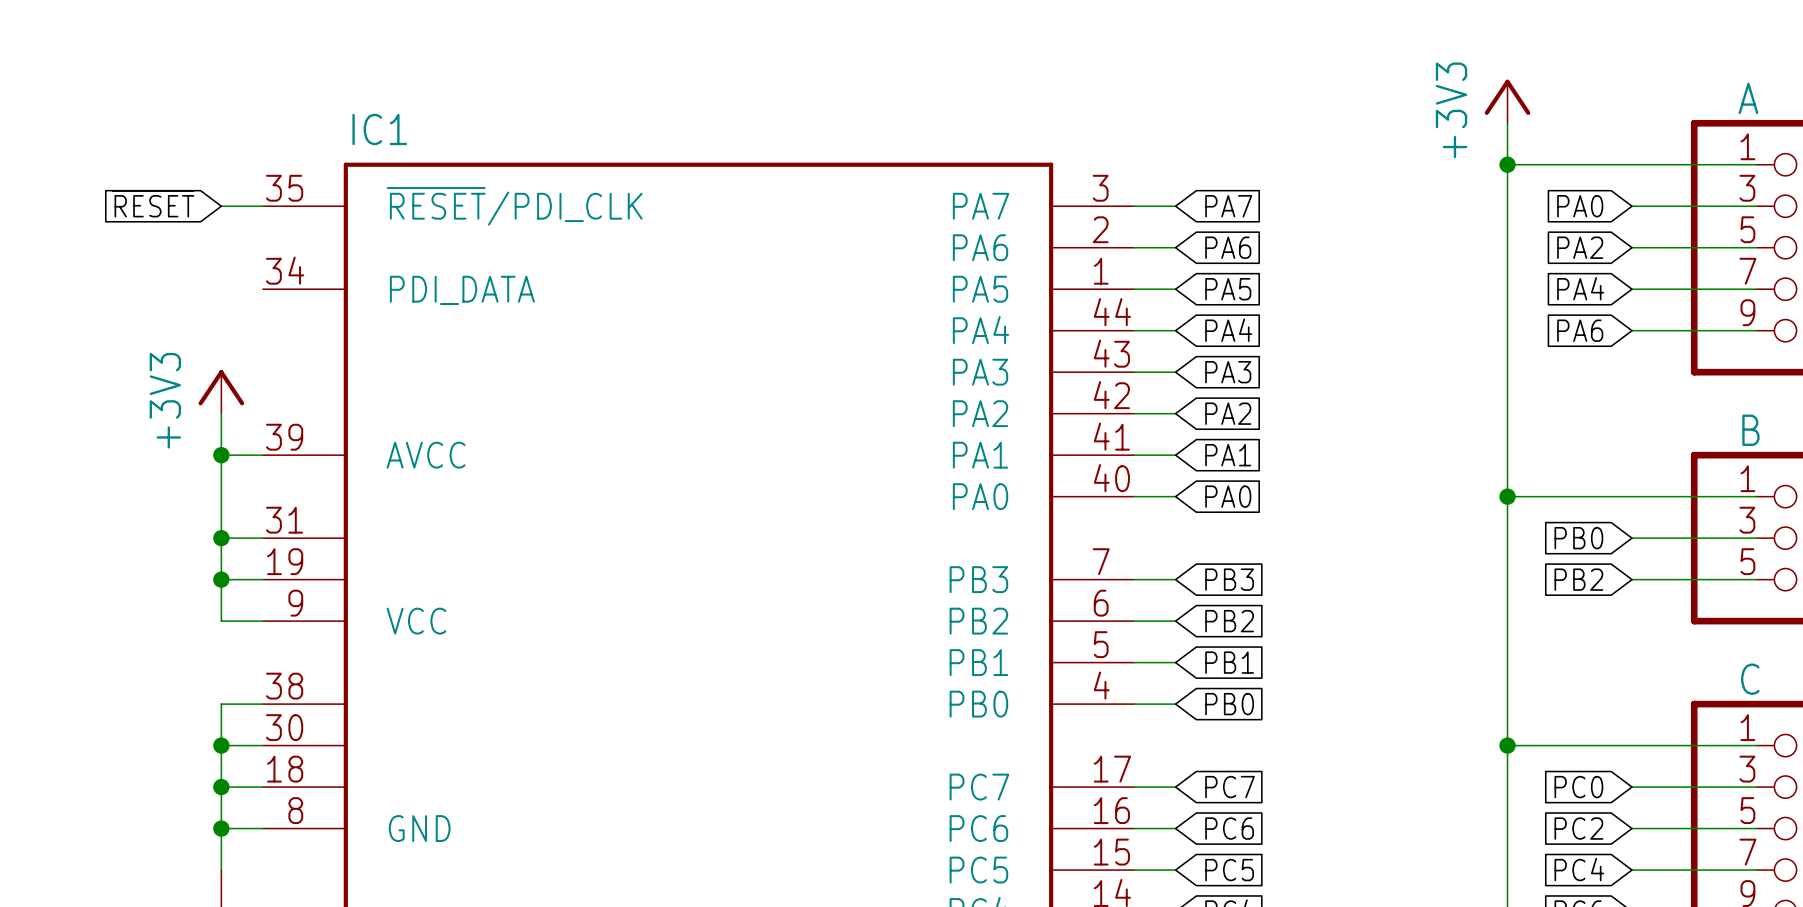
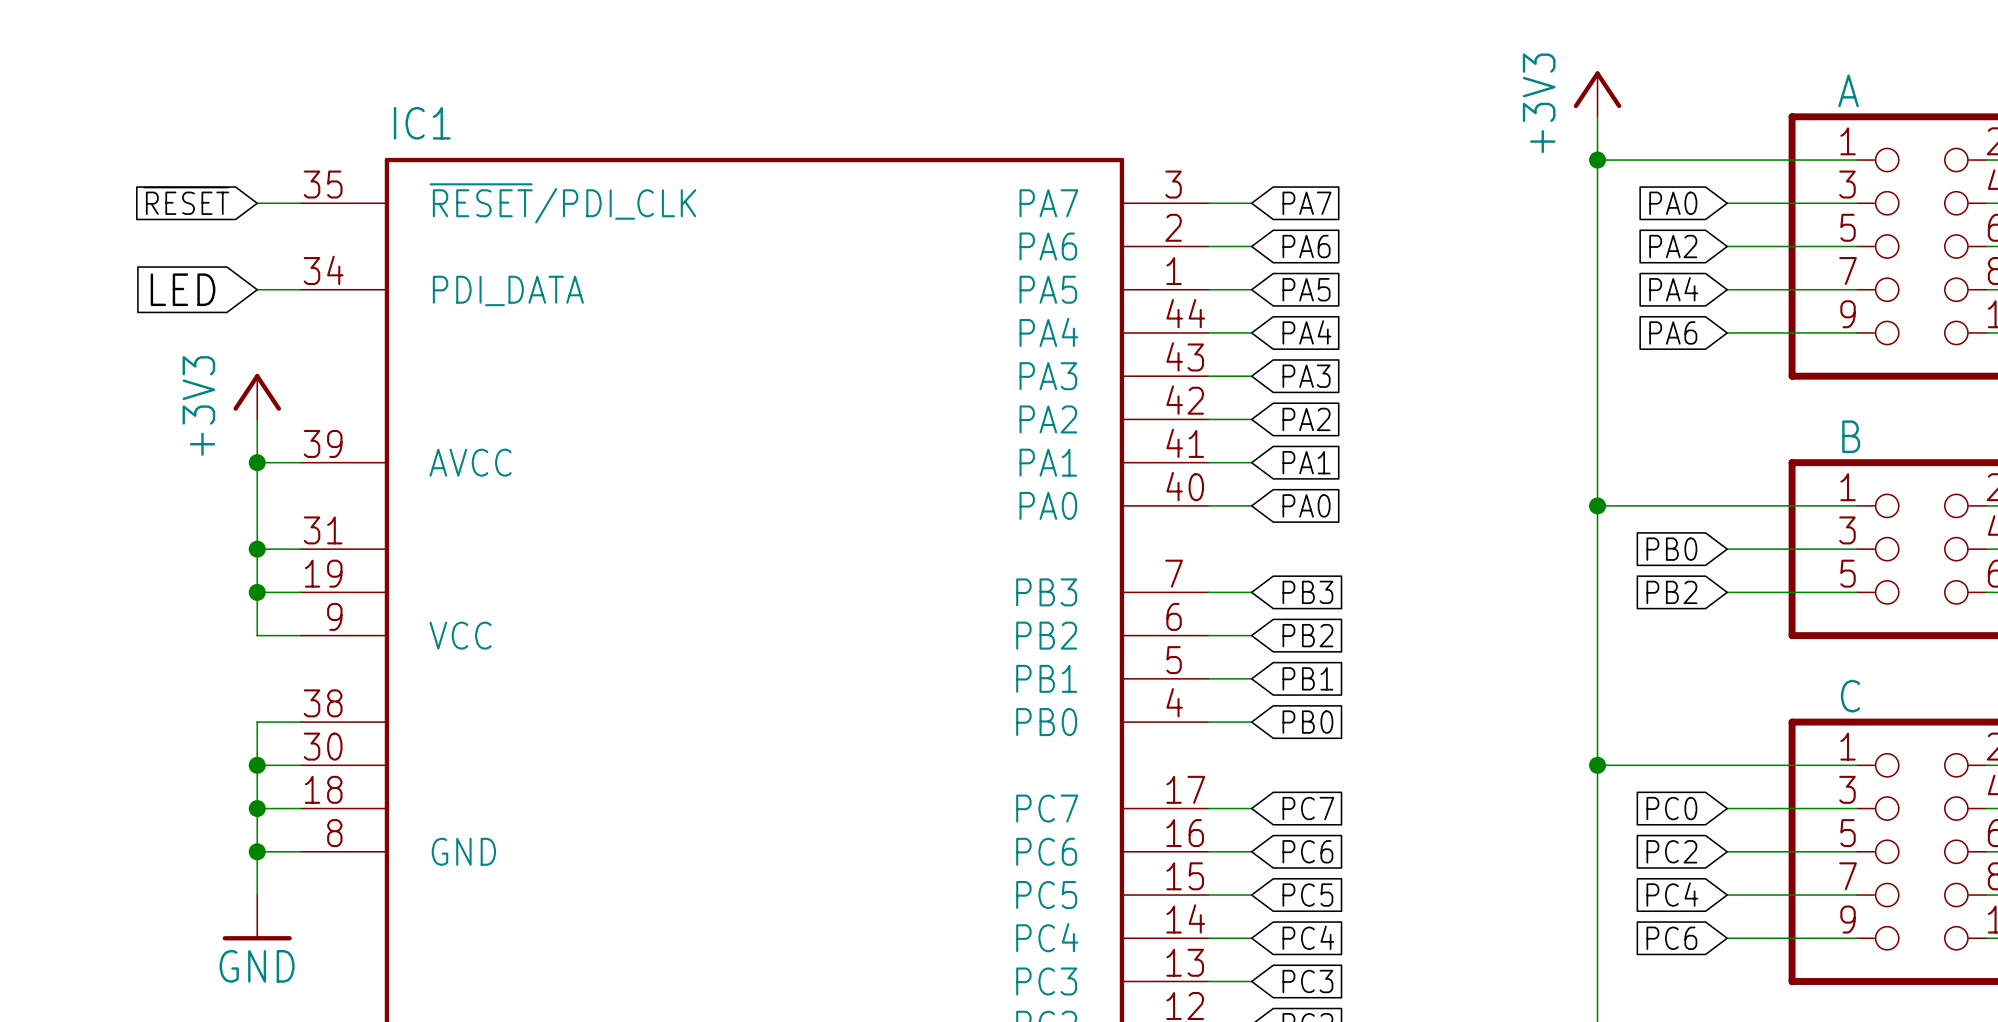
global label: none -> LED (183, 289)
wire: none -> (257, 289) (300, 289)

